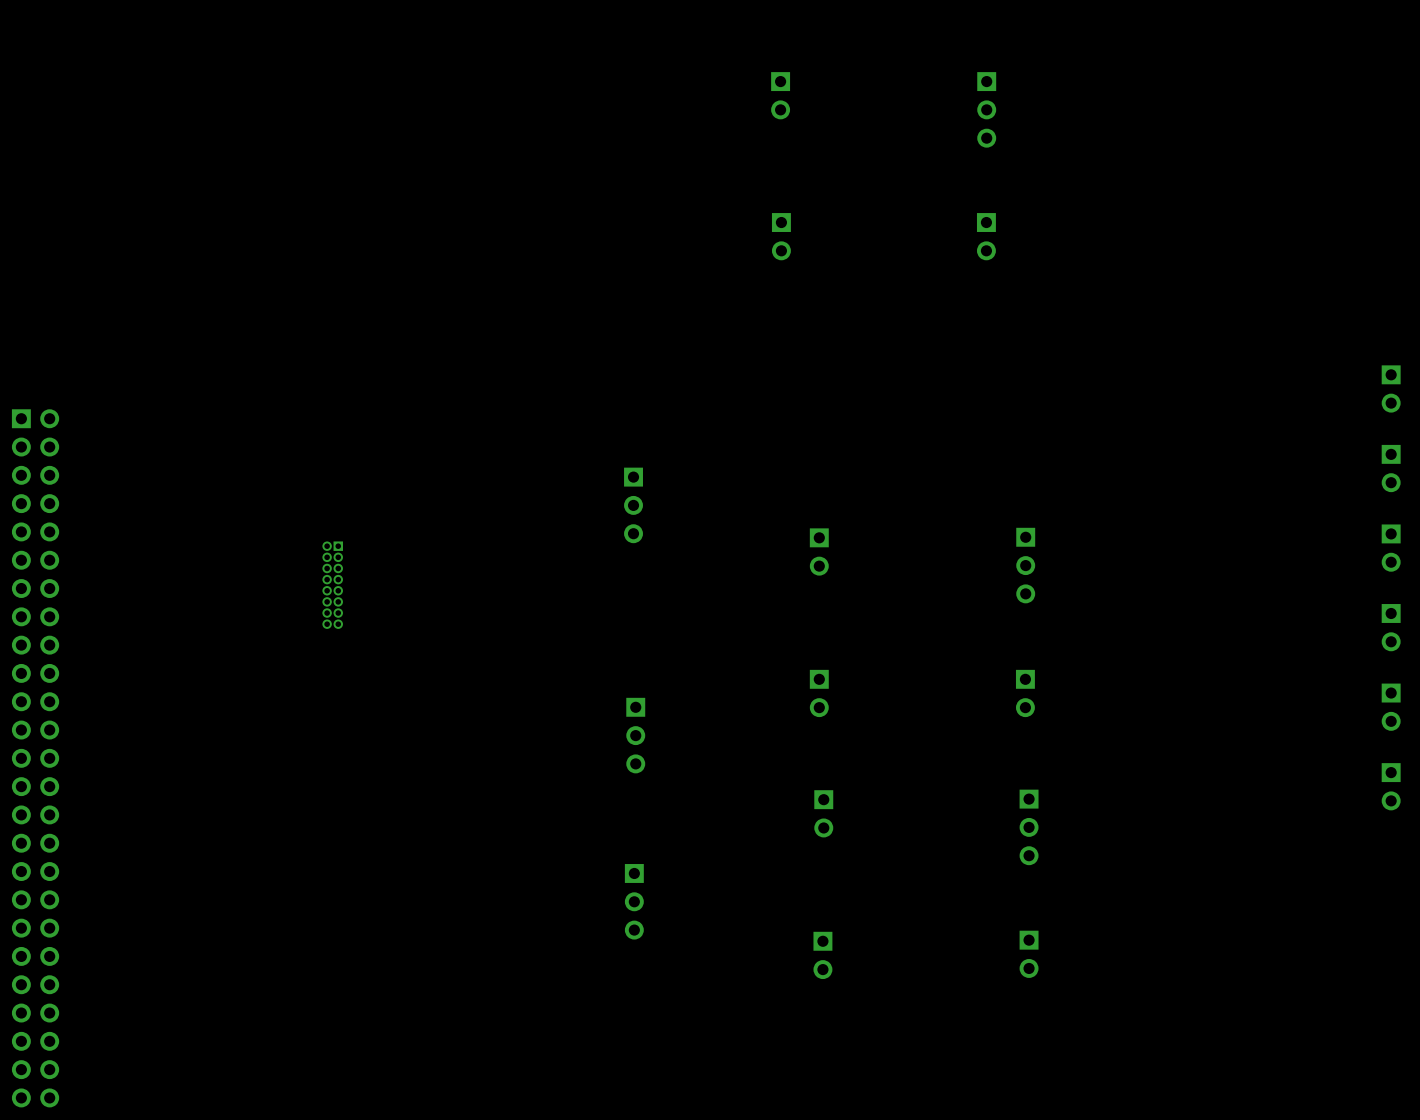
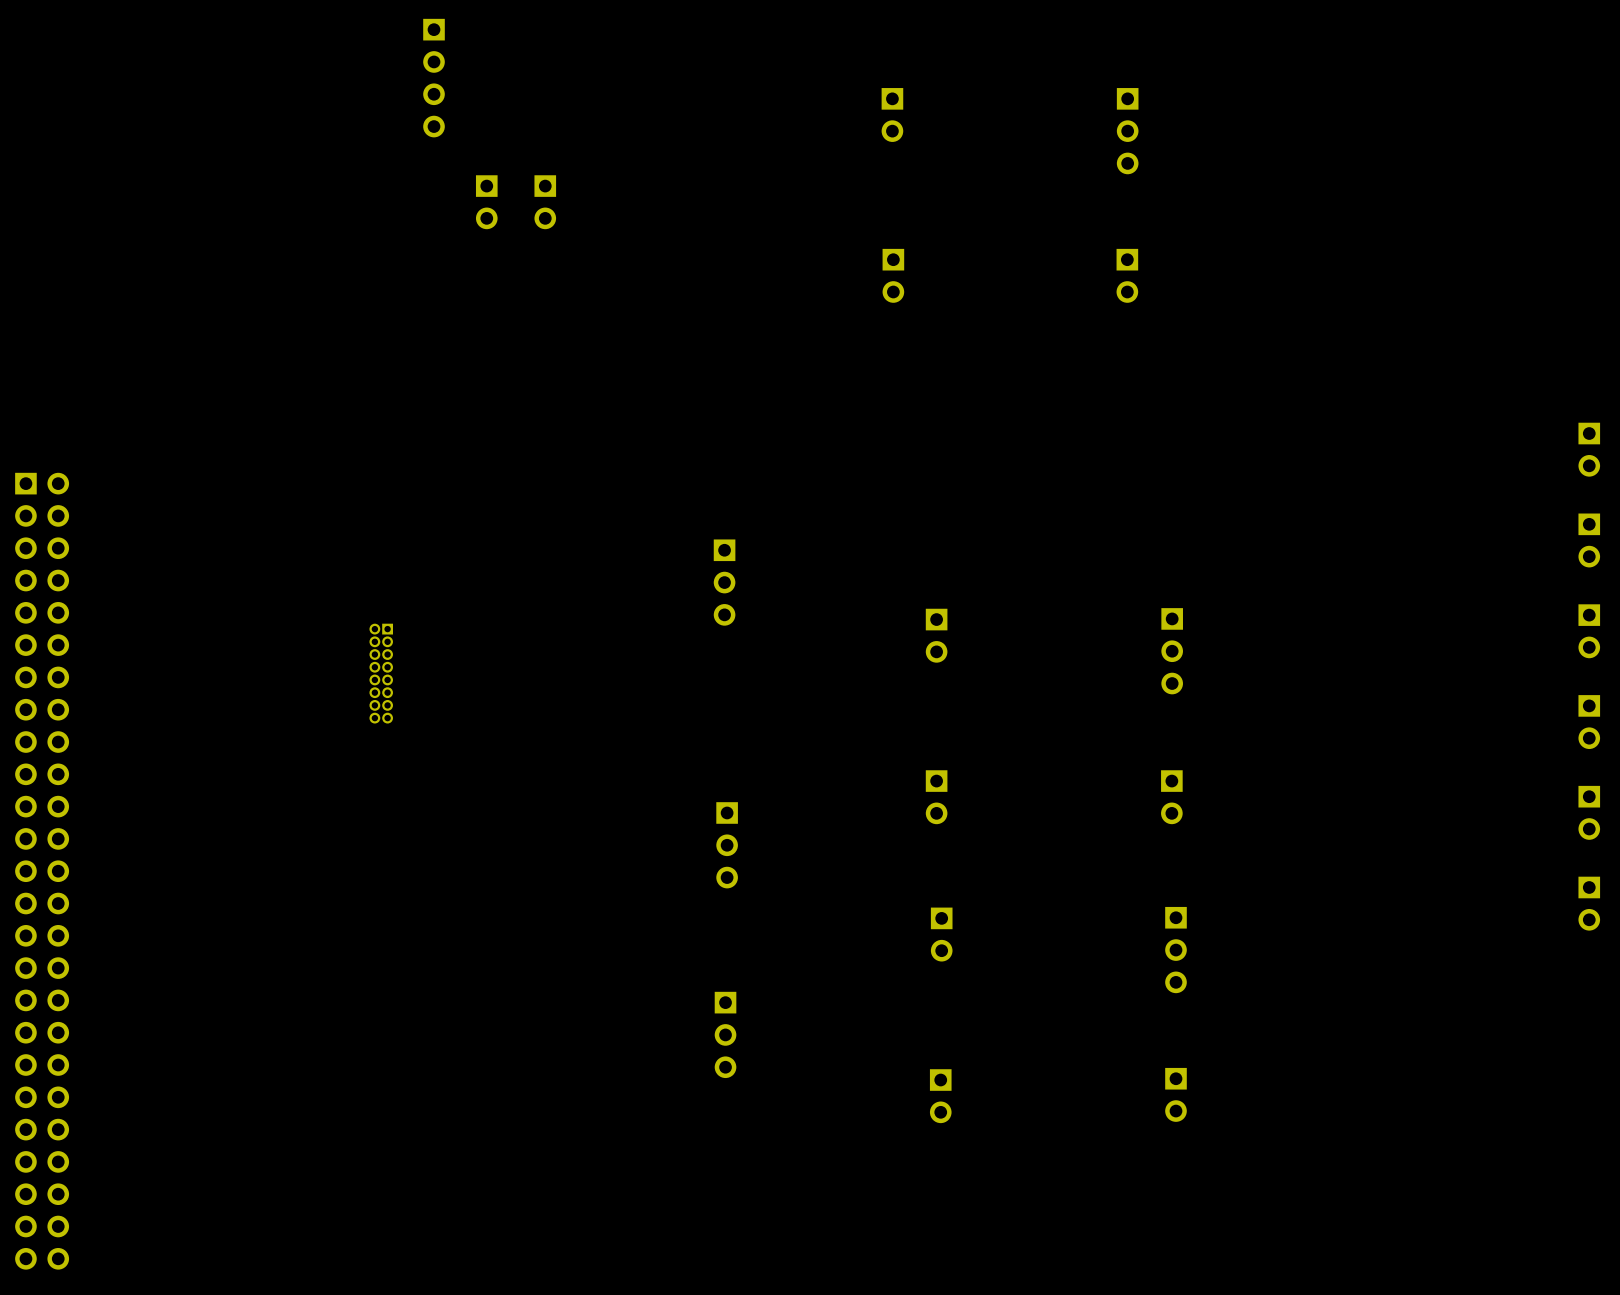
part: none -> (434, 78)
part: none -> (486, 202)
part: none -> (545, 202)

